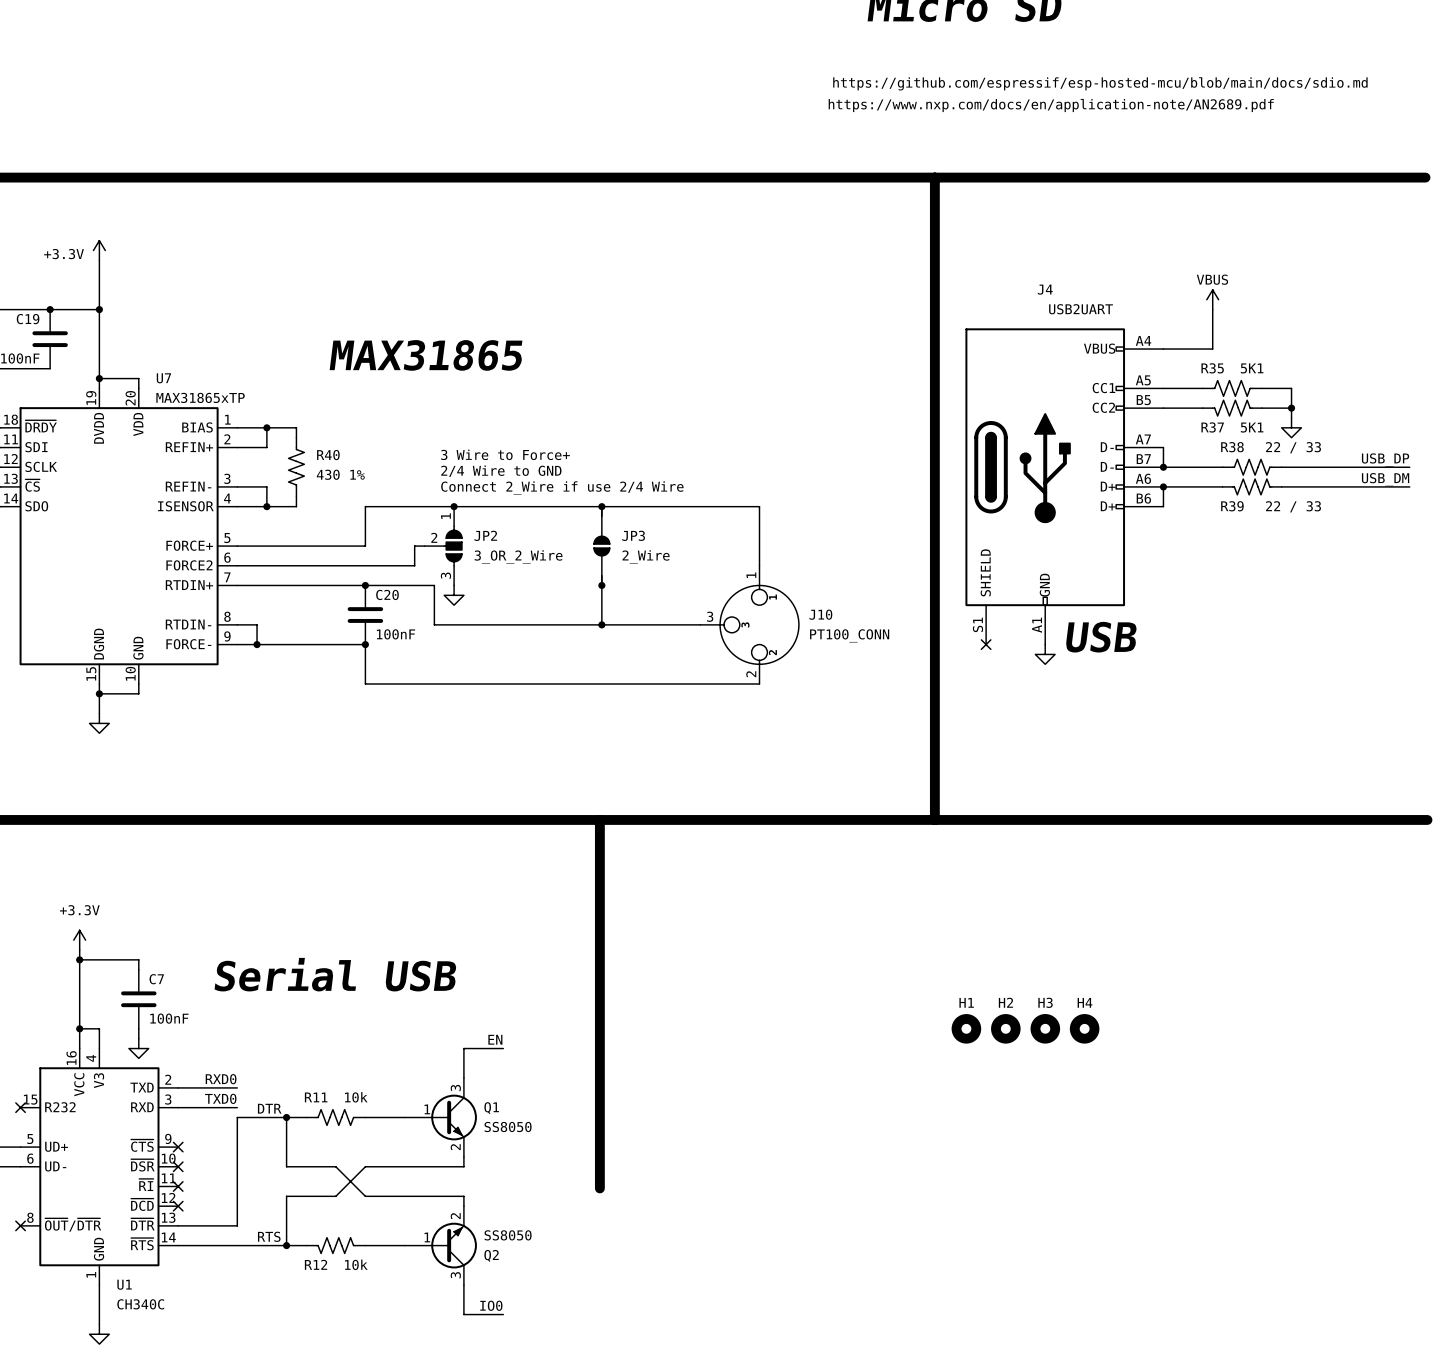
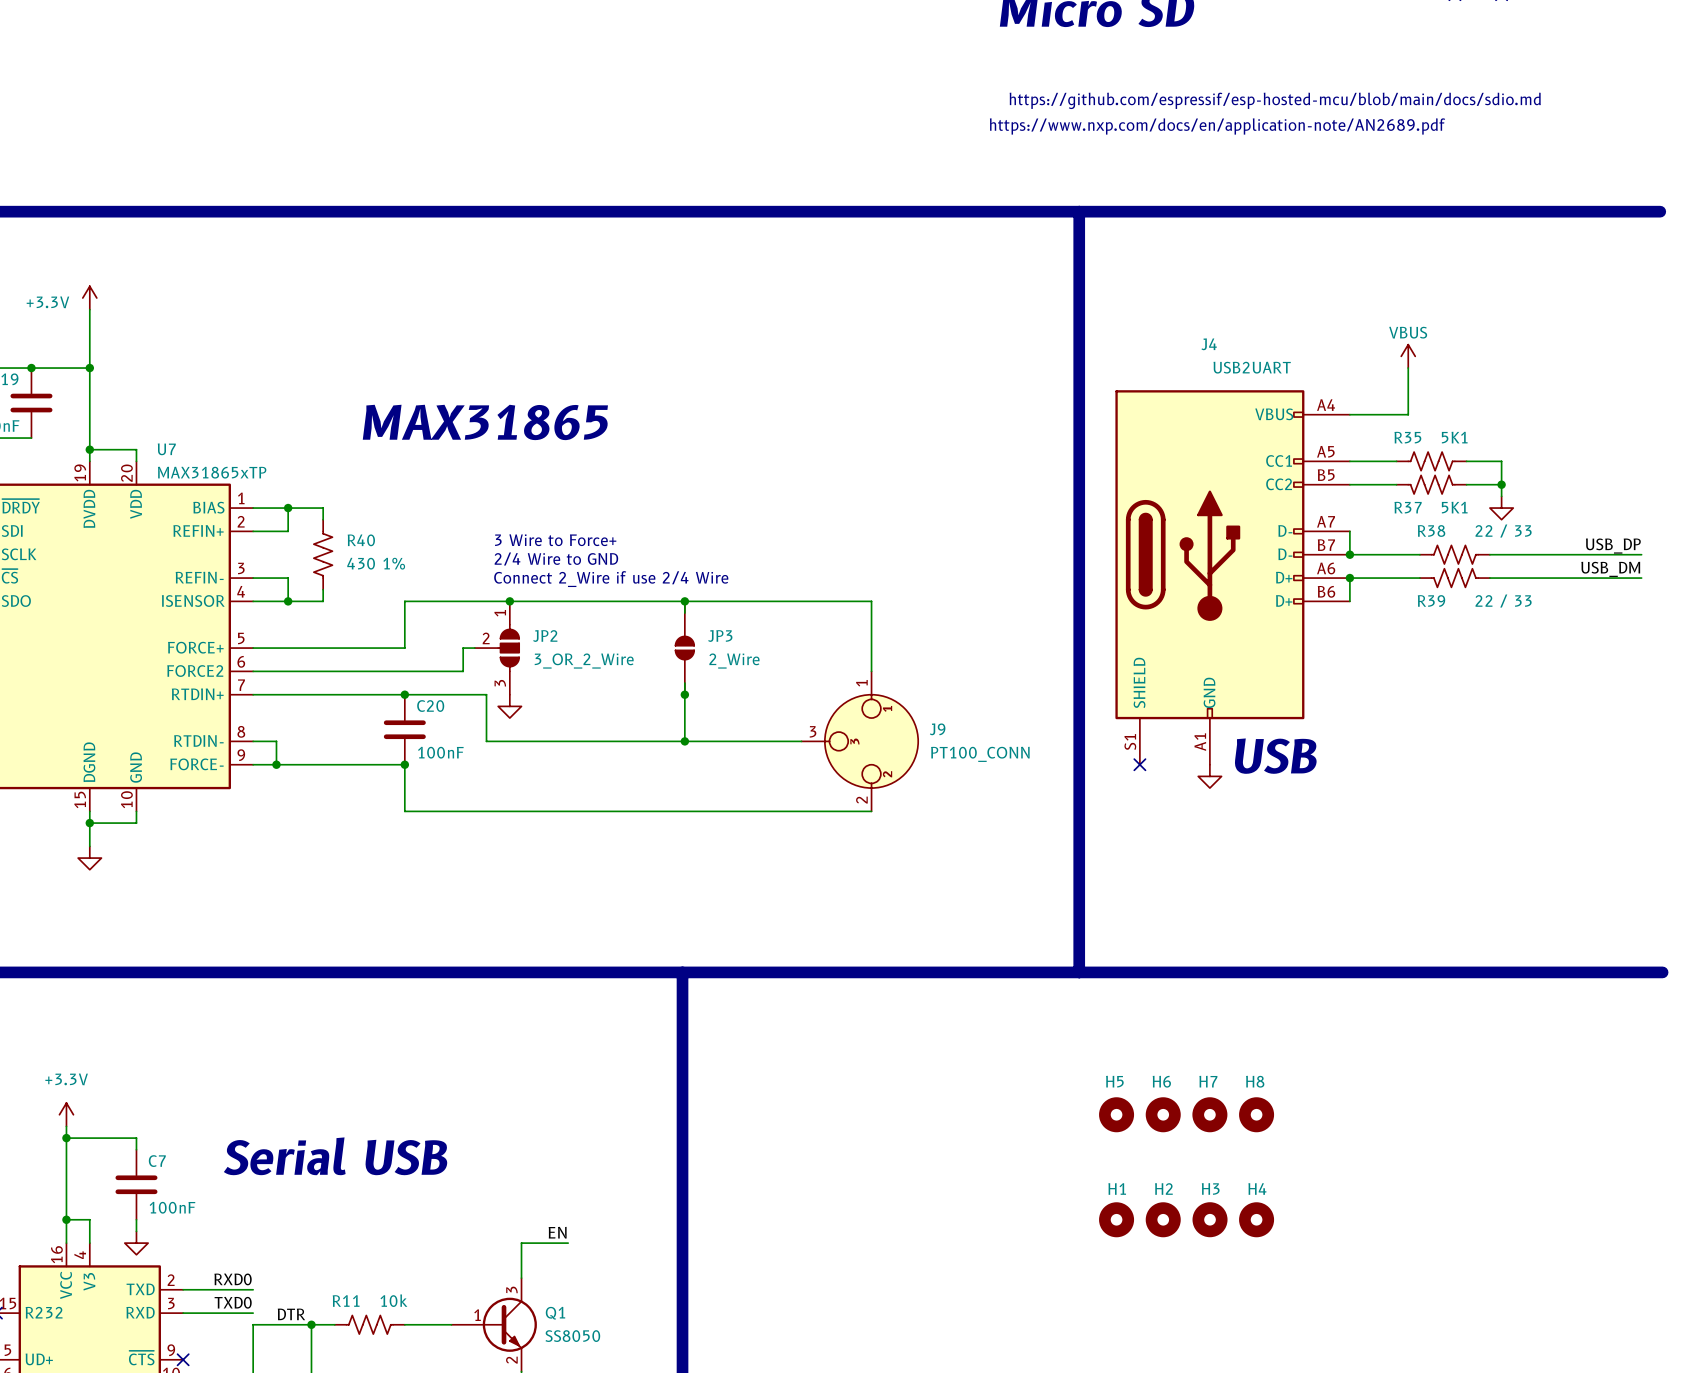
J10 name: J10 (820, 614) -> J9 (937, 729)
H5: none -> (1116, 1114)
H6: none -> (1163, 1114)
H7: none -> (1209, 1114)
H8: none -> (1256, 1114)

